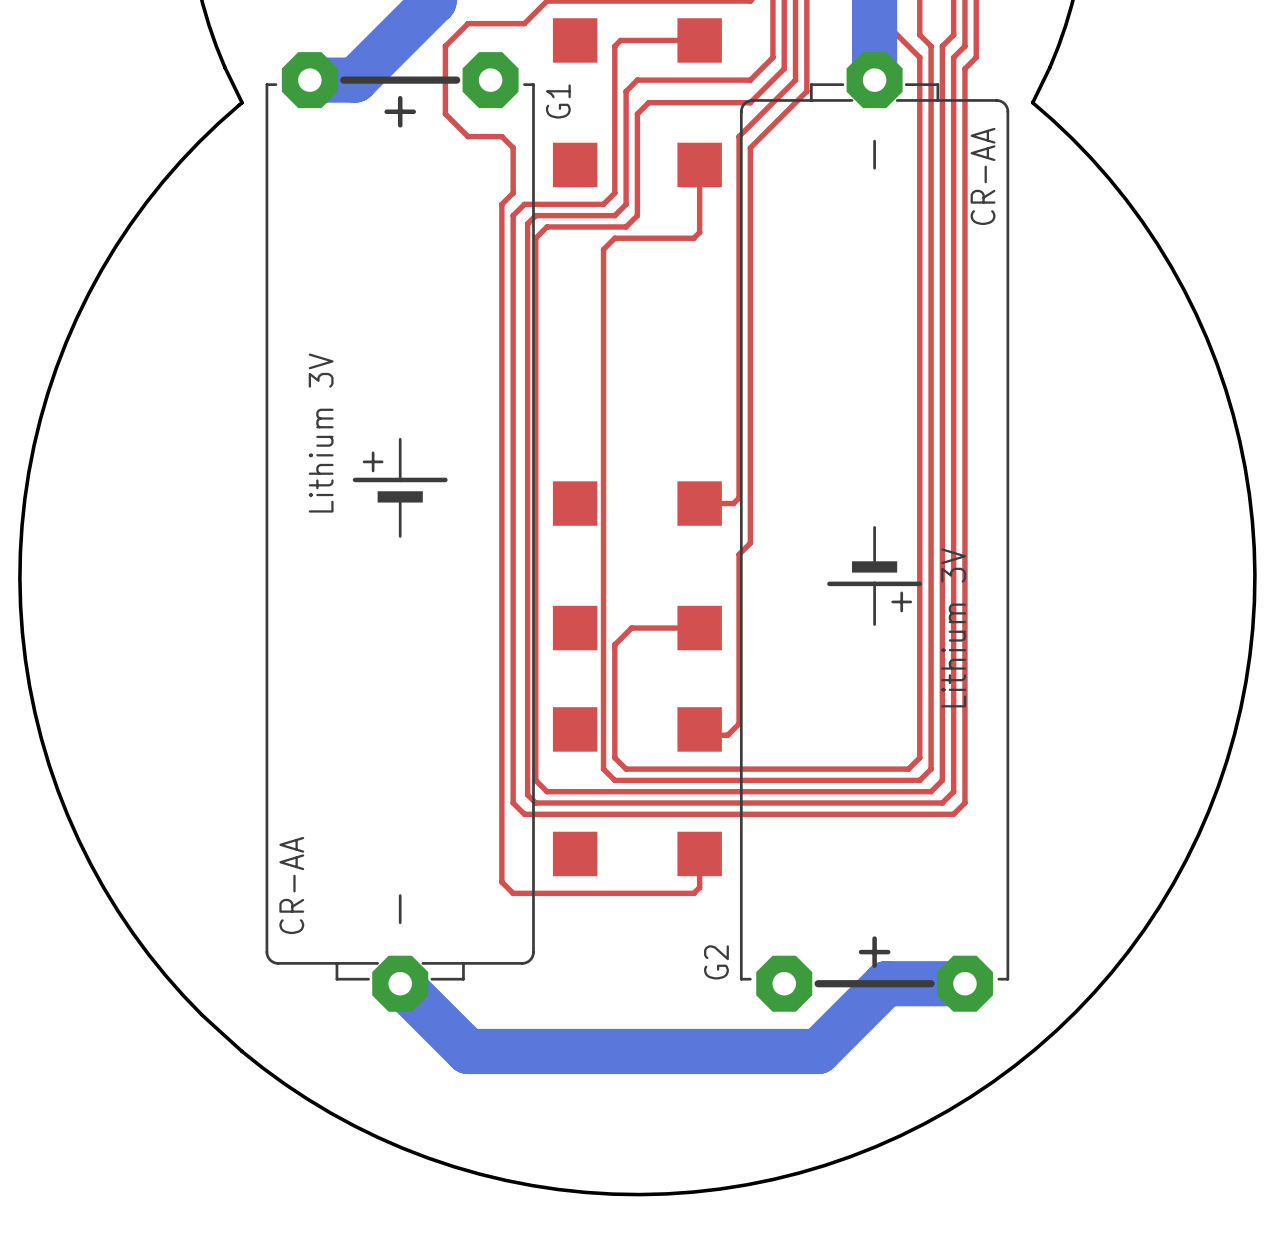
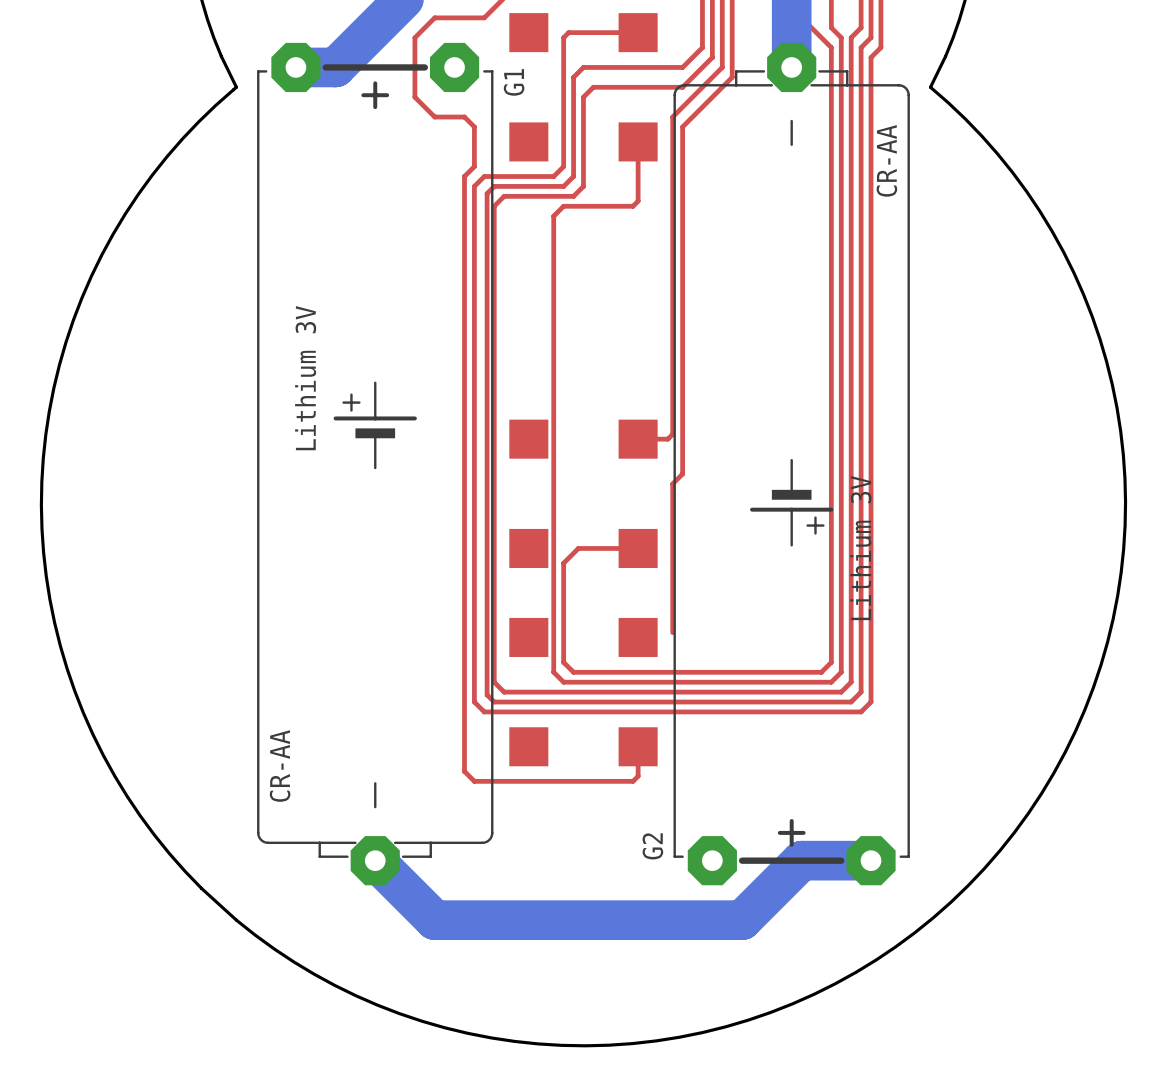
top track: (739, 723) (727, 735) (705, 735) -> none

